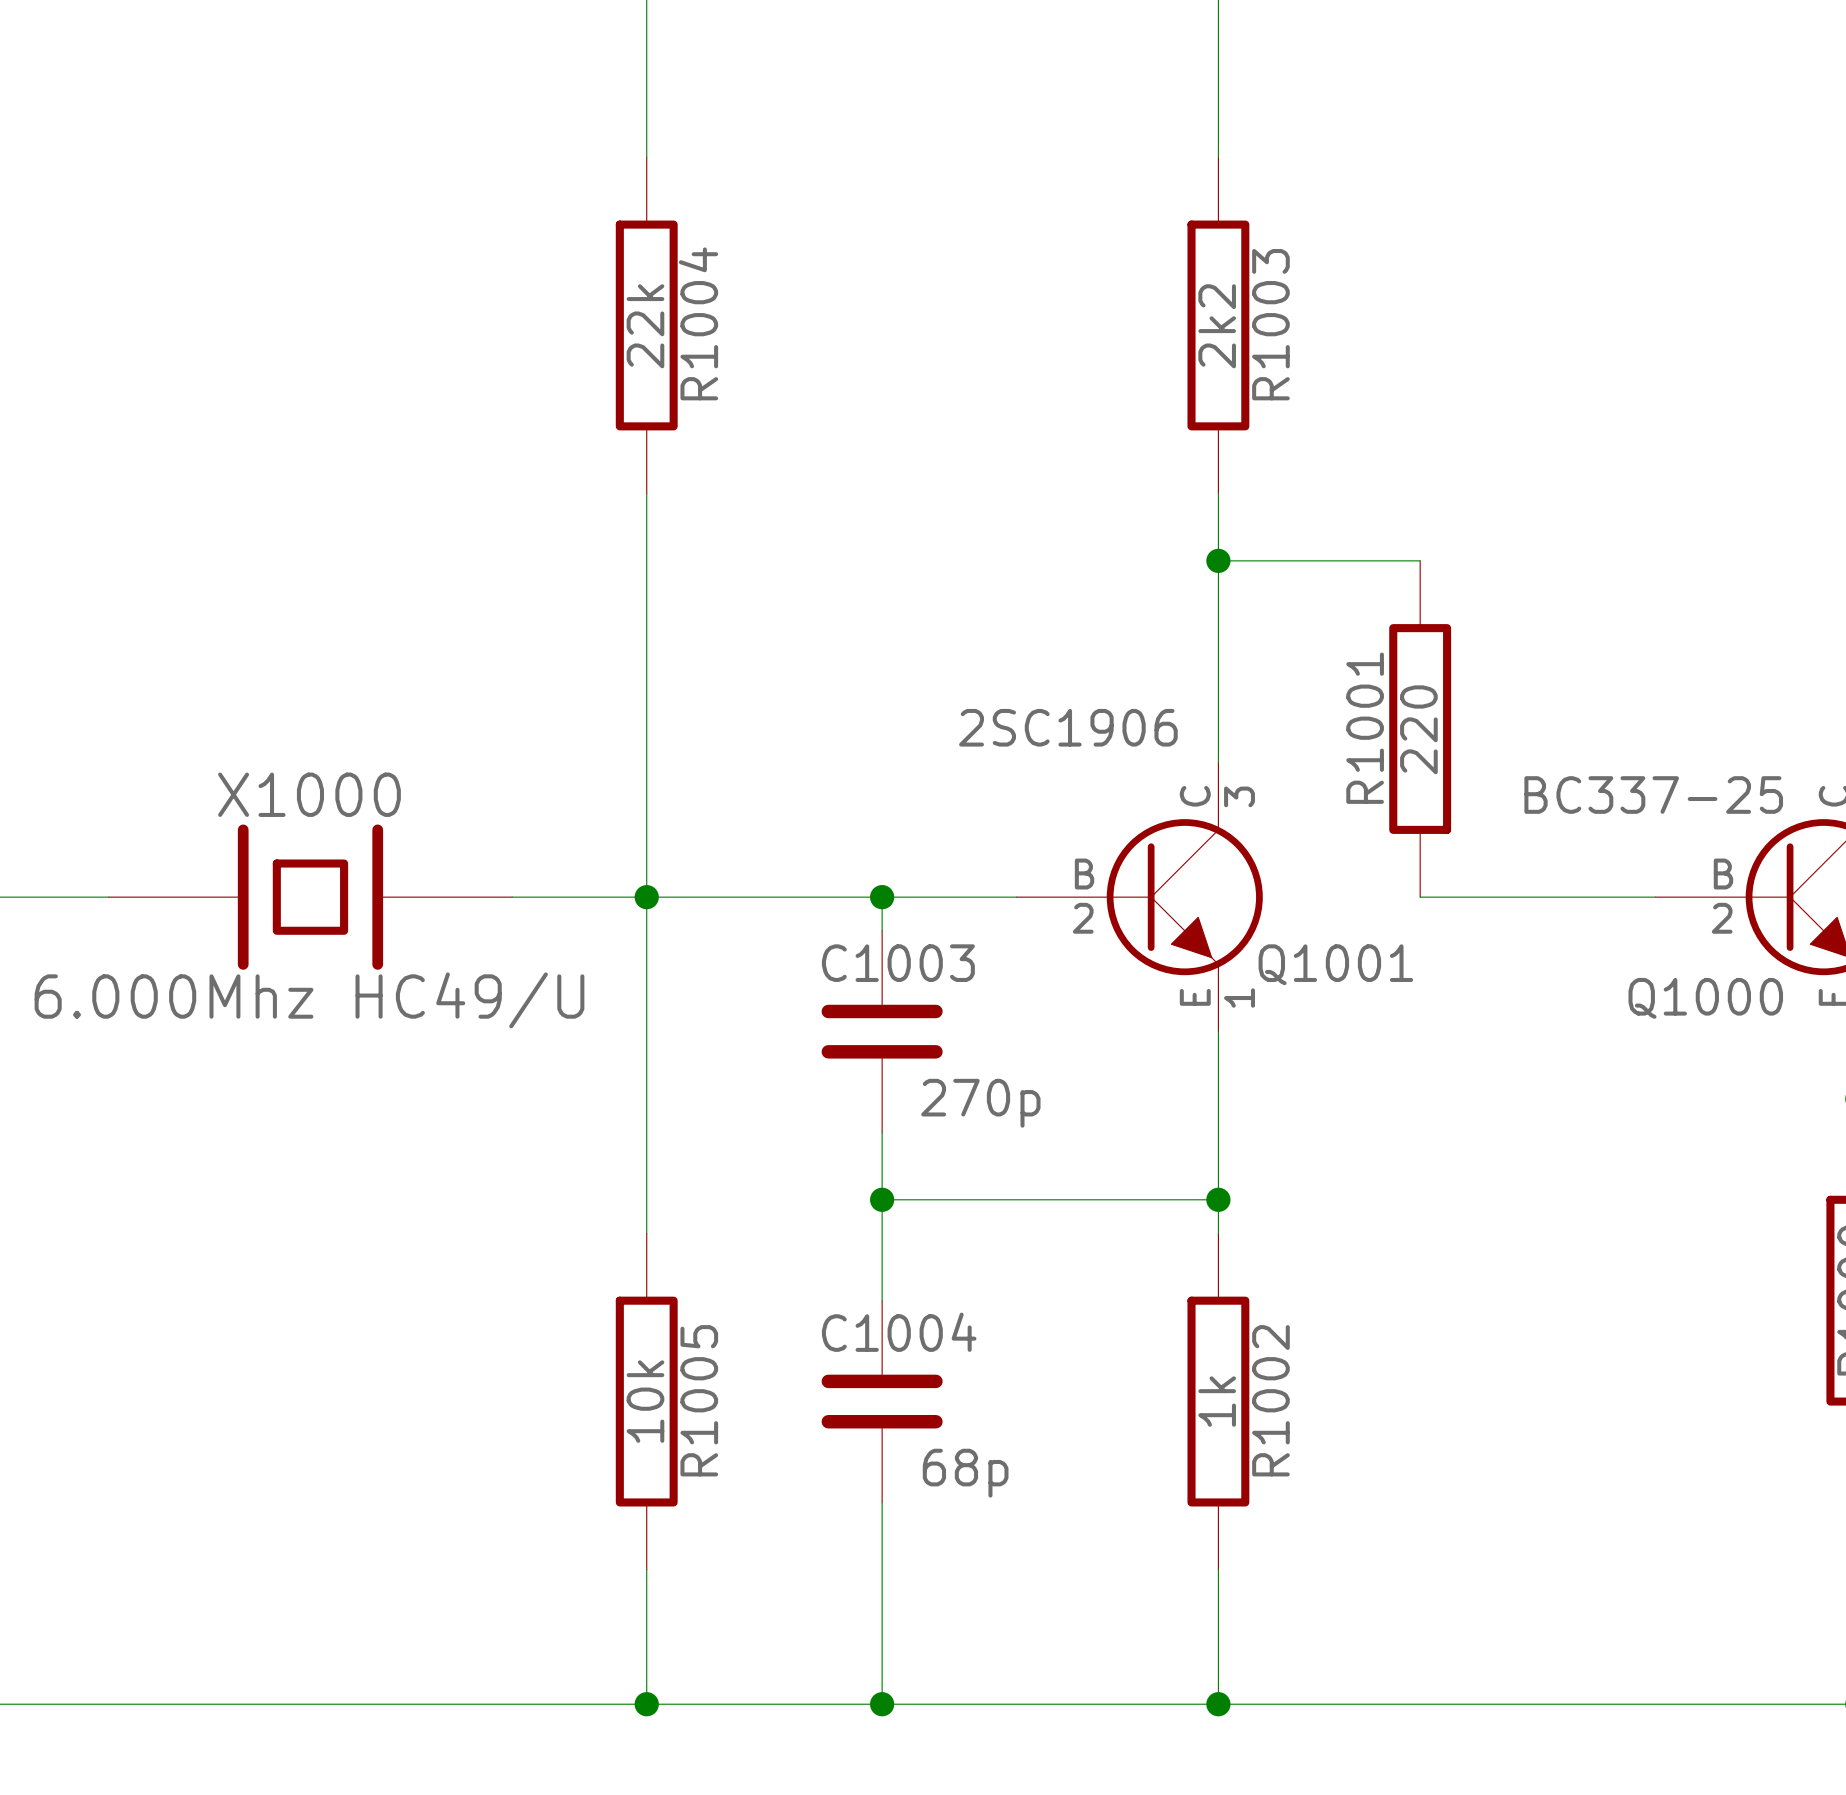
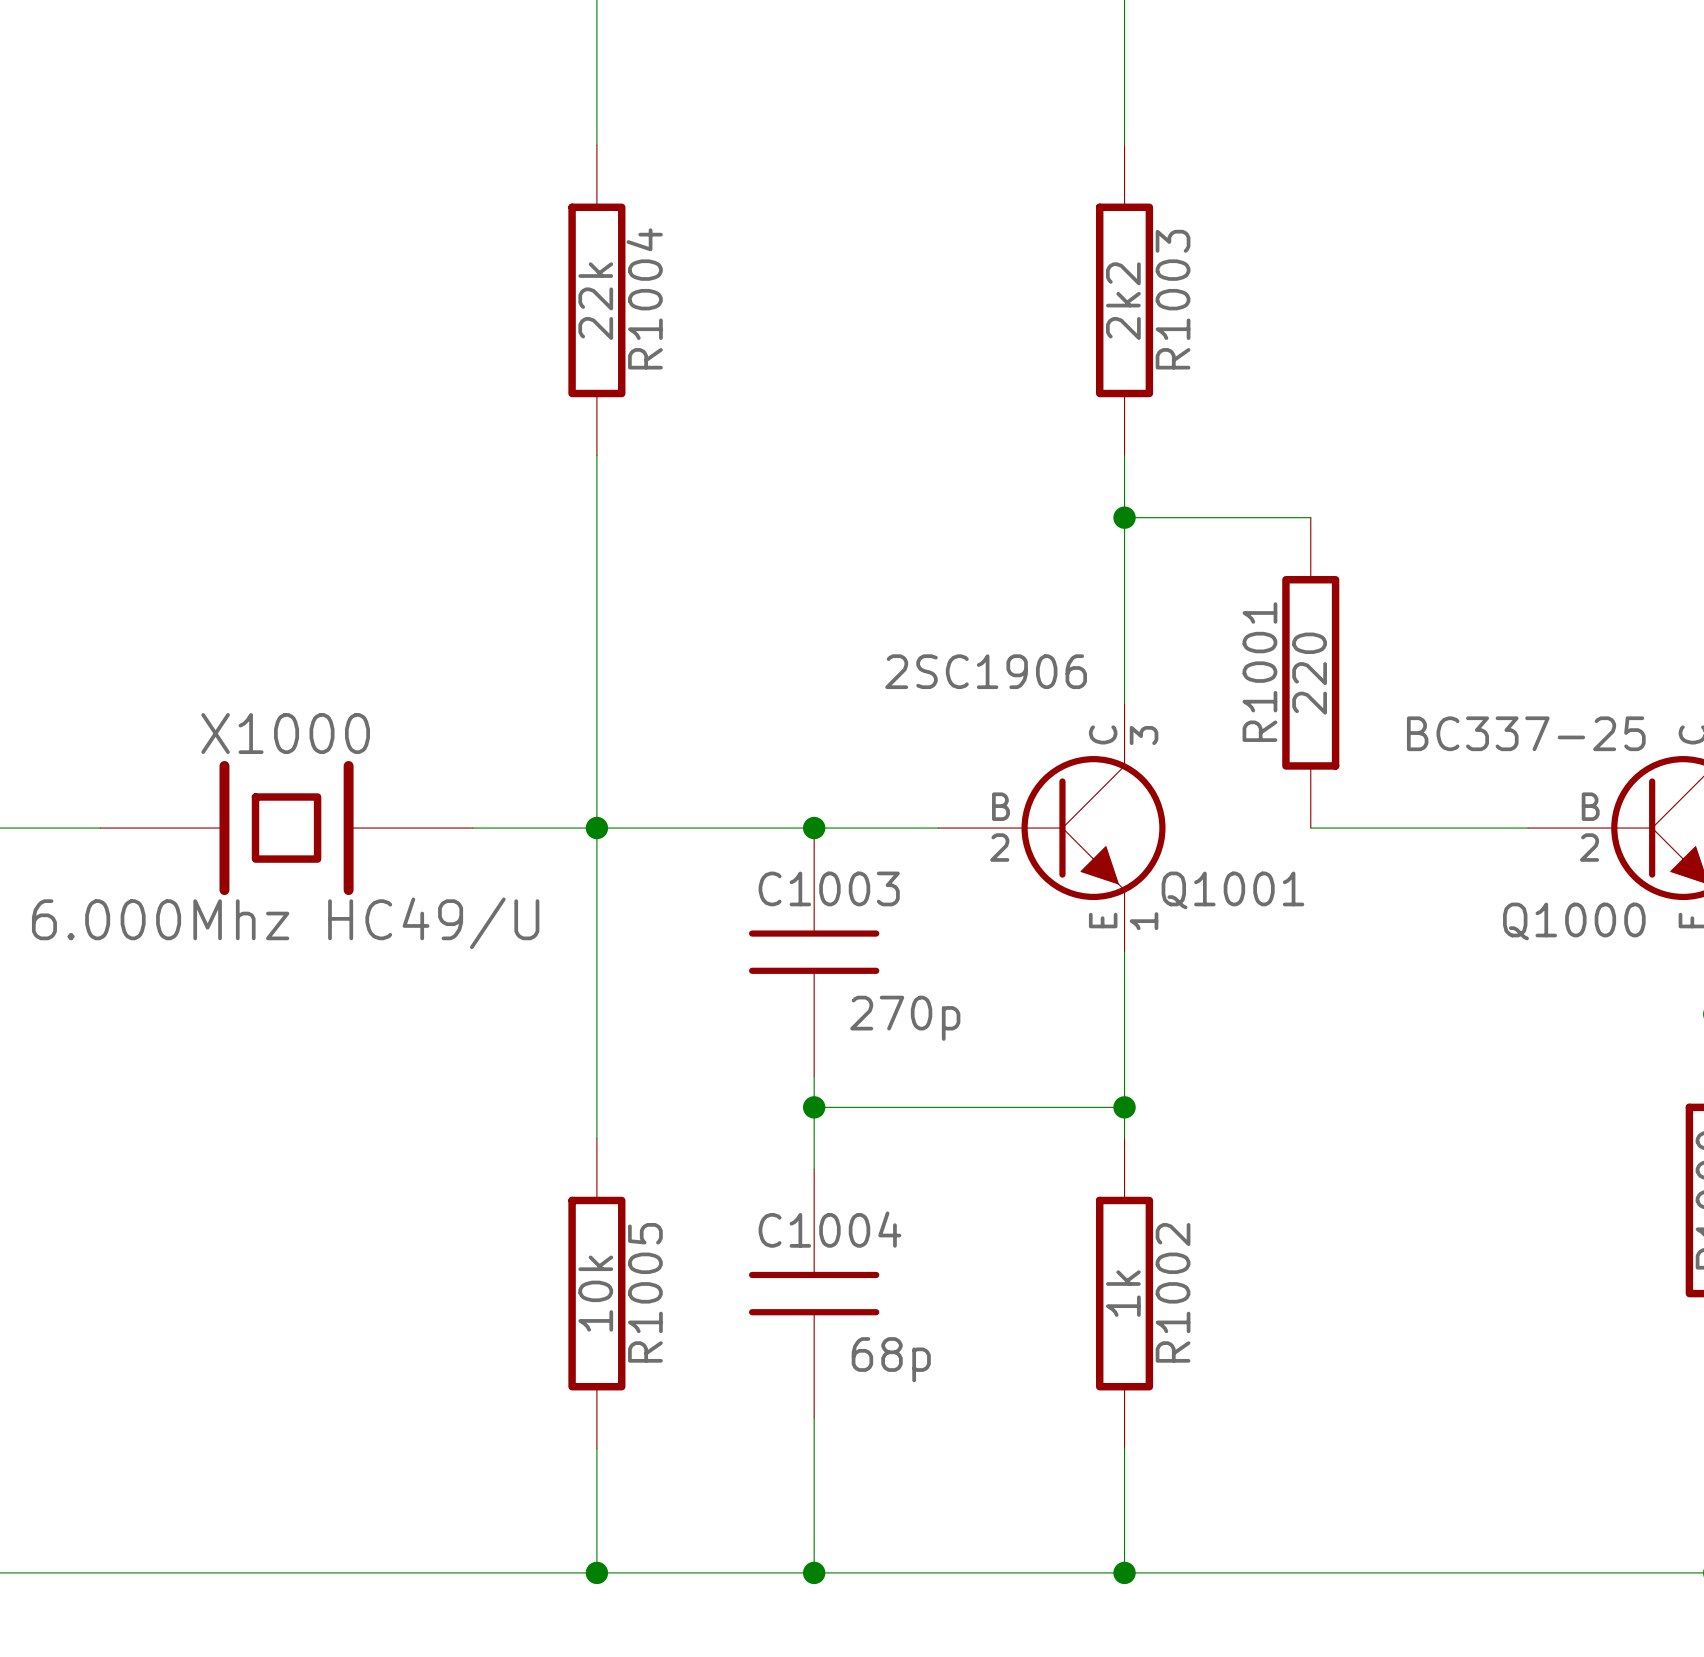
C1003 symbol: [821, 930, 943, 1133] -> [748, 828, 880, 1077]
C1004 symbol: [821, 1300, 943, 1503] -> [748, 1169, 880, 1418]

